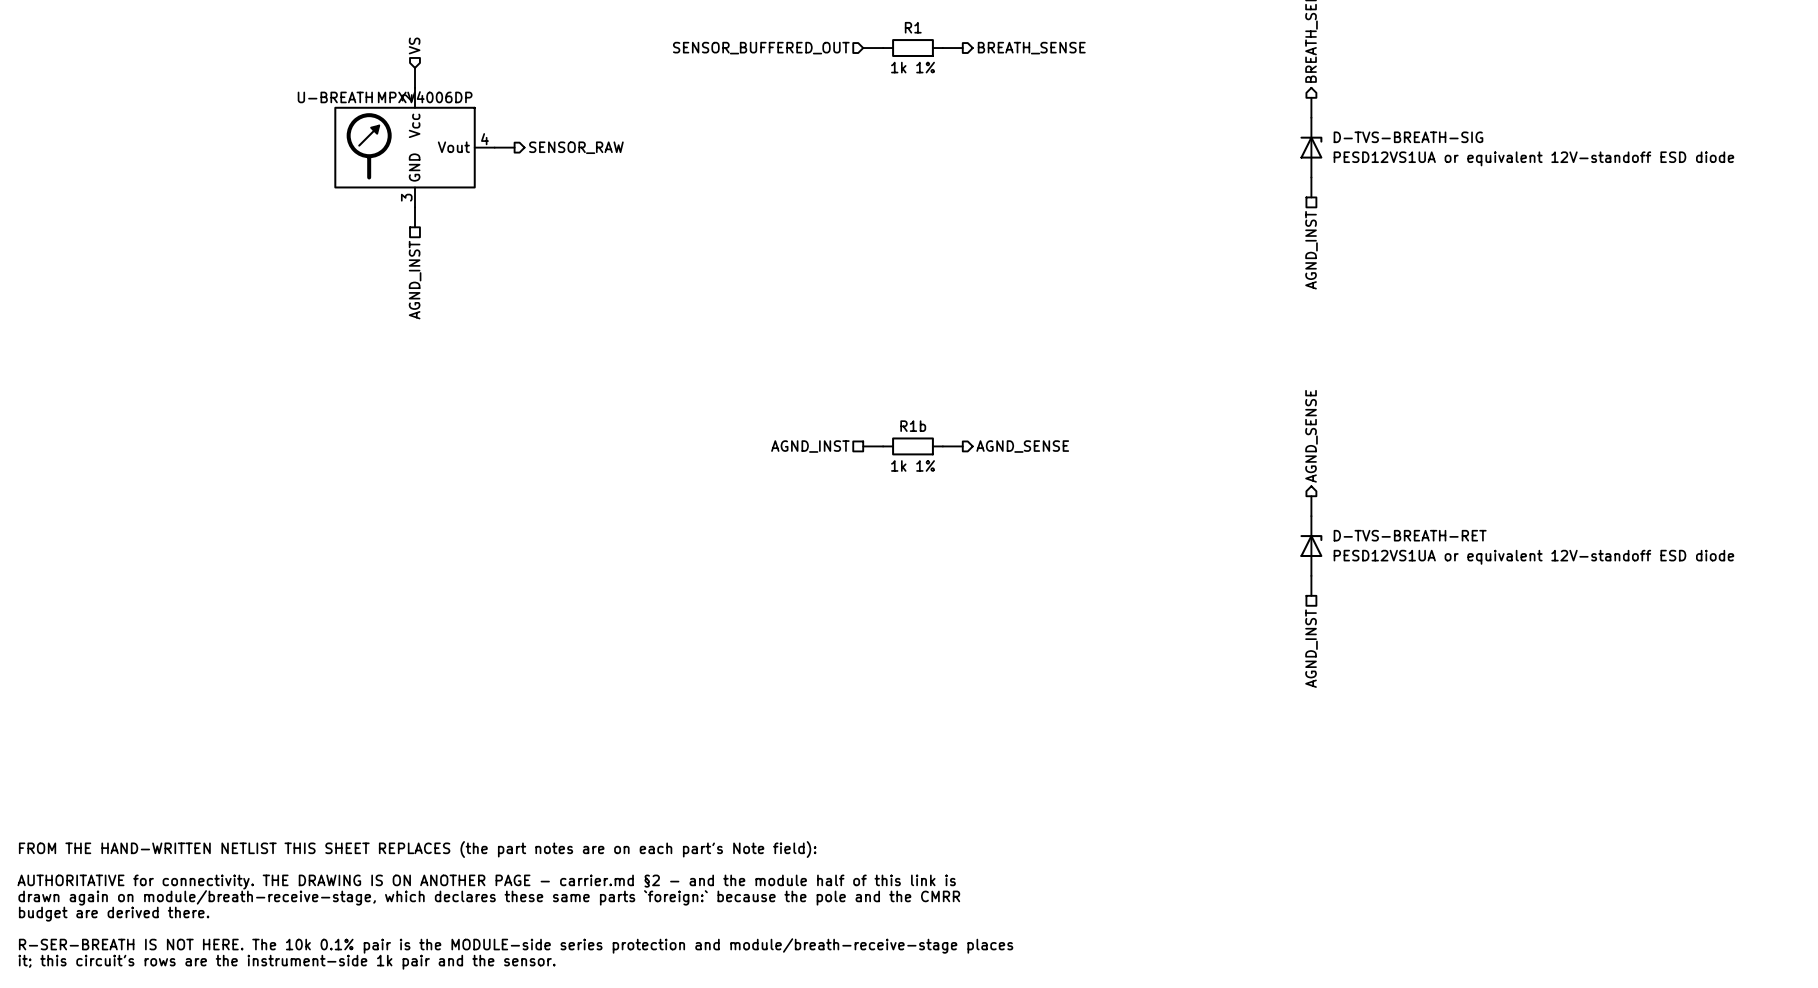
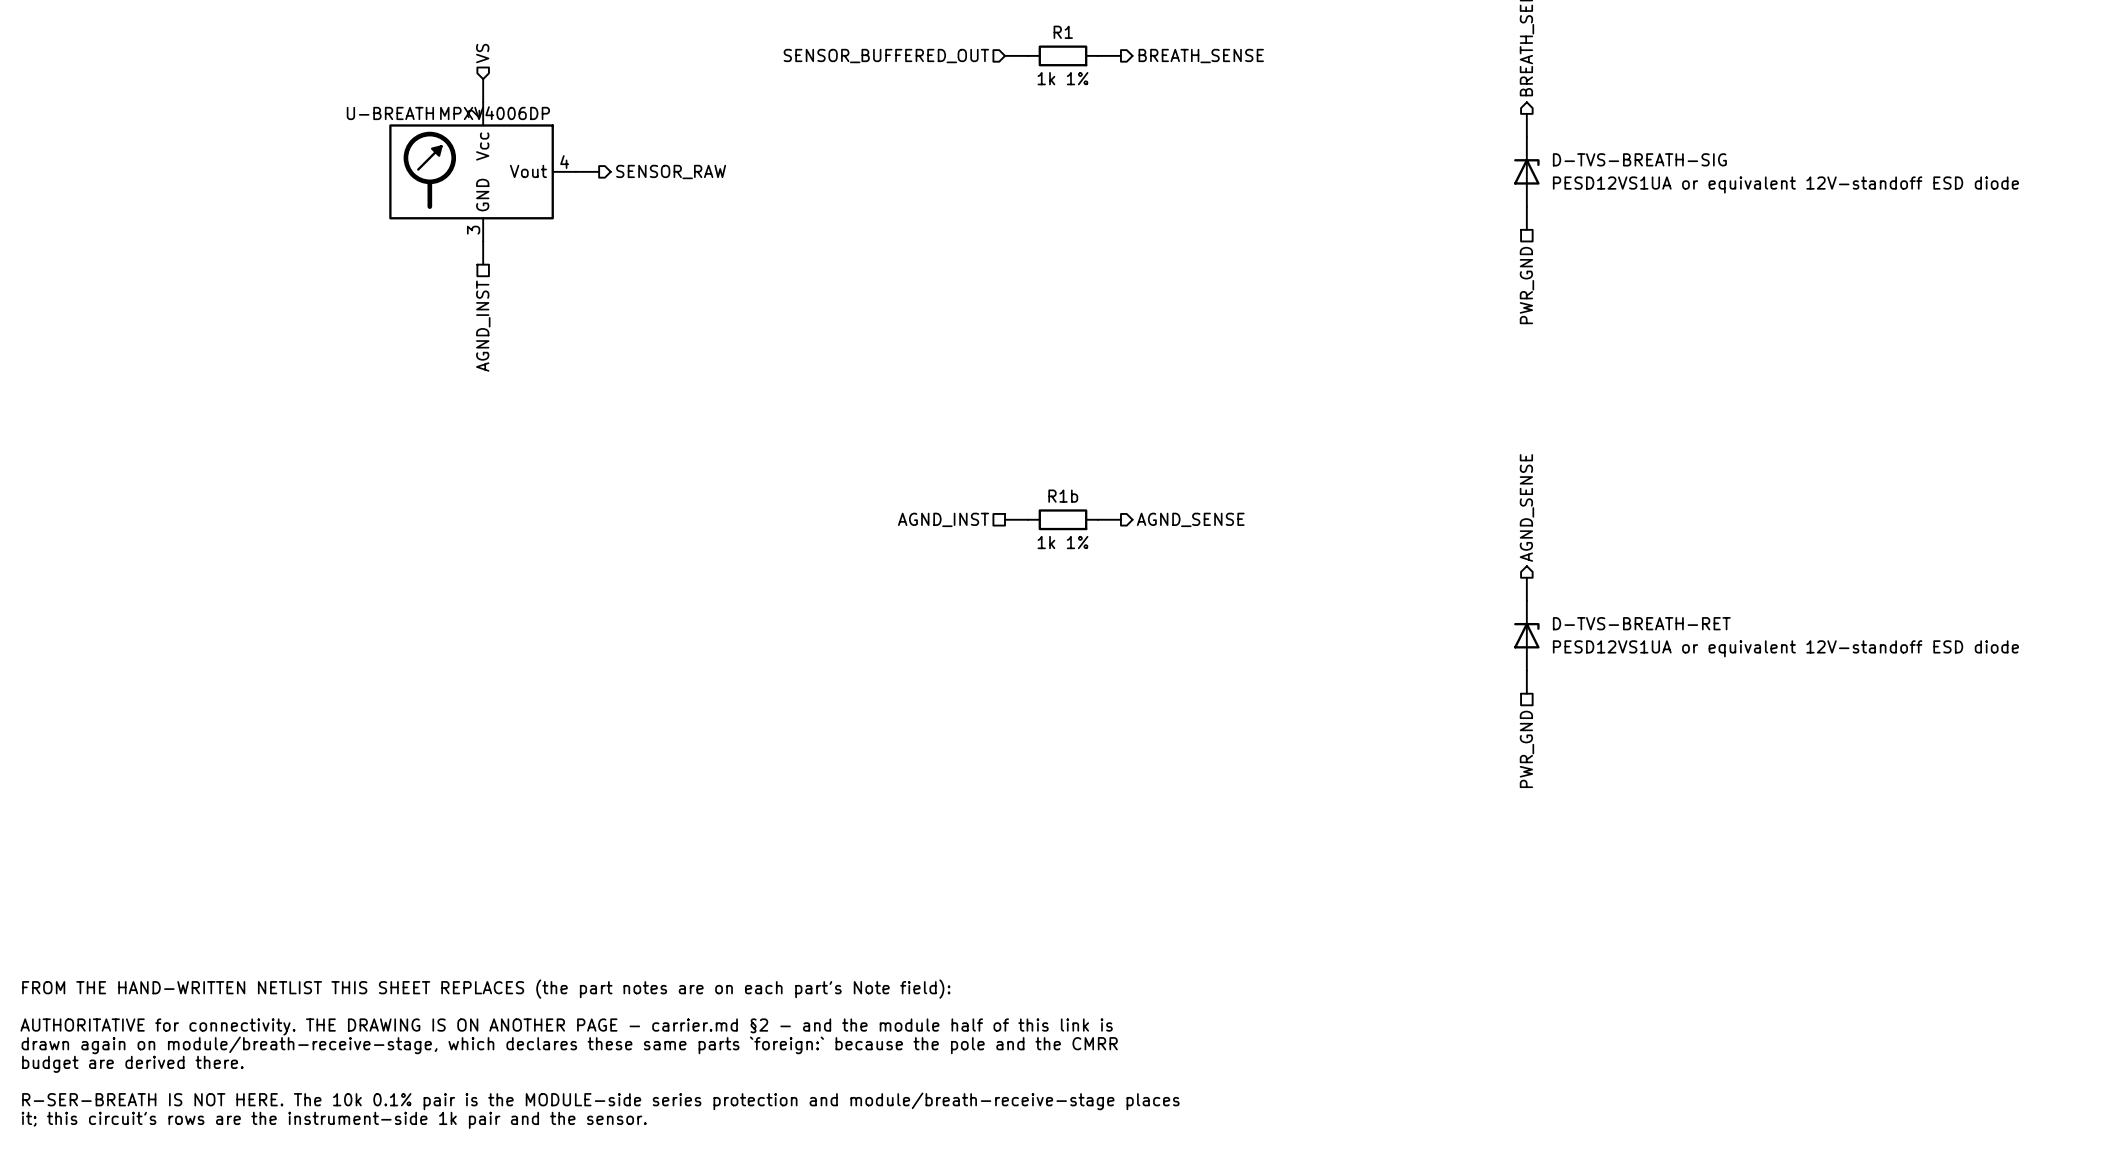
hierarchical label: AGND_INST (1311, 250) -> PWR_GND (1526, 285)
hierarchical label: AGND_INST (1311, 648) -> PWR_GND (1526, 749)

